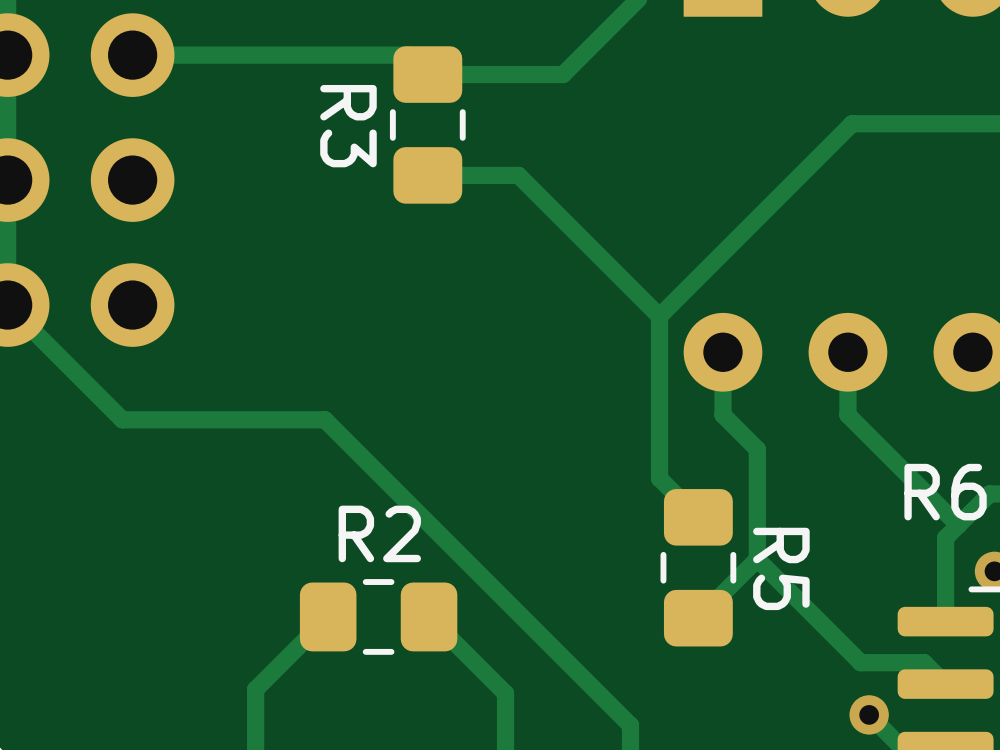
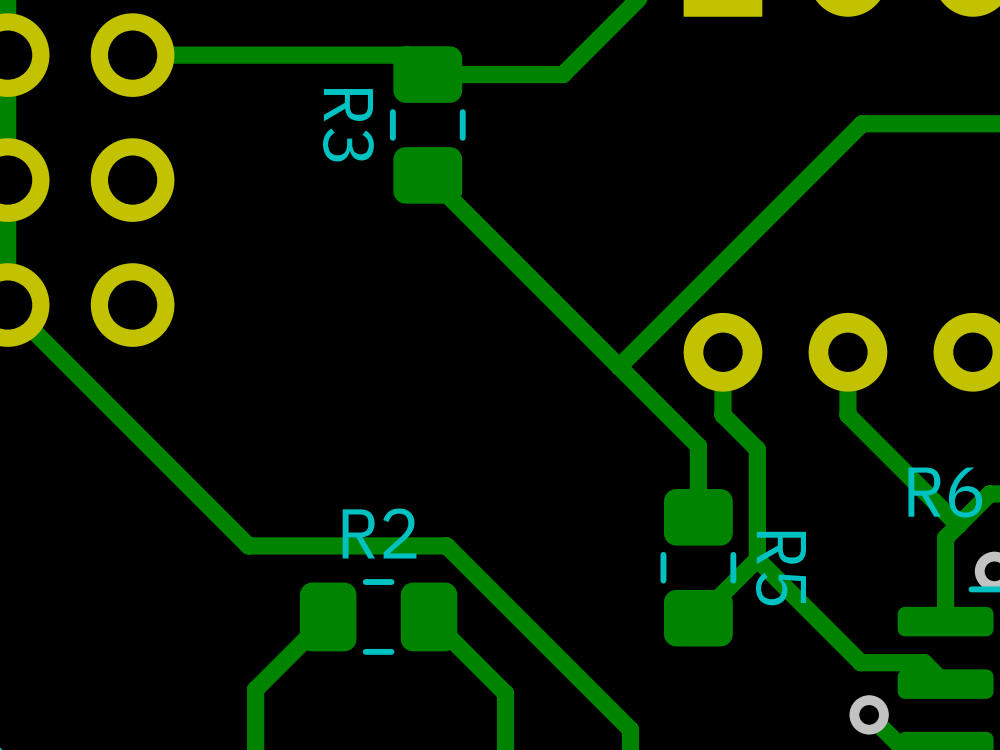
track: (862, 123) (852, 123) (659, 316) -> (862, 123) (619, 366)
track: (427, 175) (518, 175) (659, 316) -> (427, 175) (698, 445) (698, 517)
track: (659, 316) (659, 478) (698, 517) -> none
track: (122, 419) (324, 419) (630, 725) (630, 729) -> (122, 419) (248, 545) (446, 545) (630, 729)

